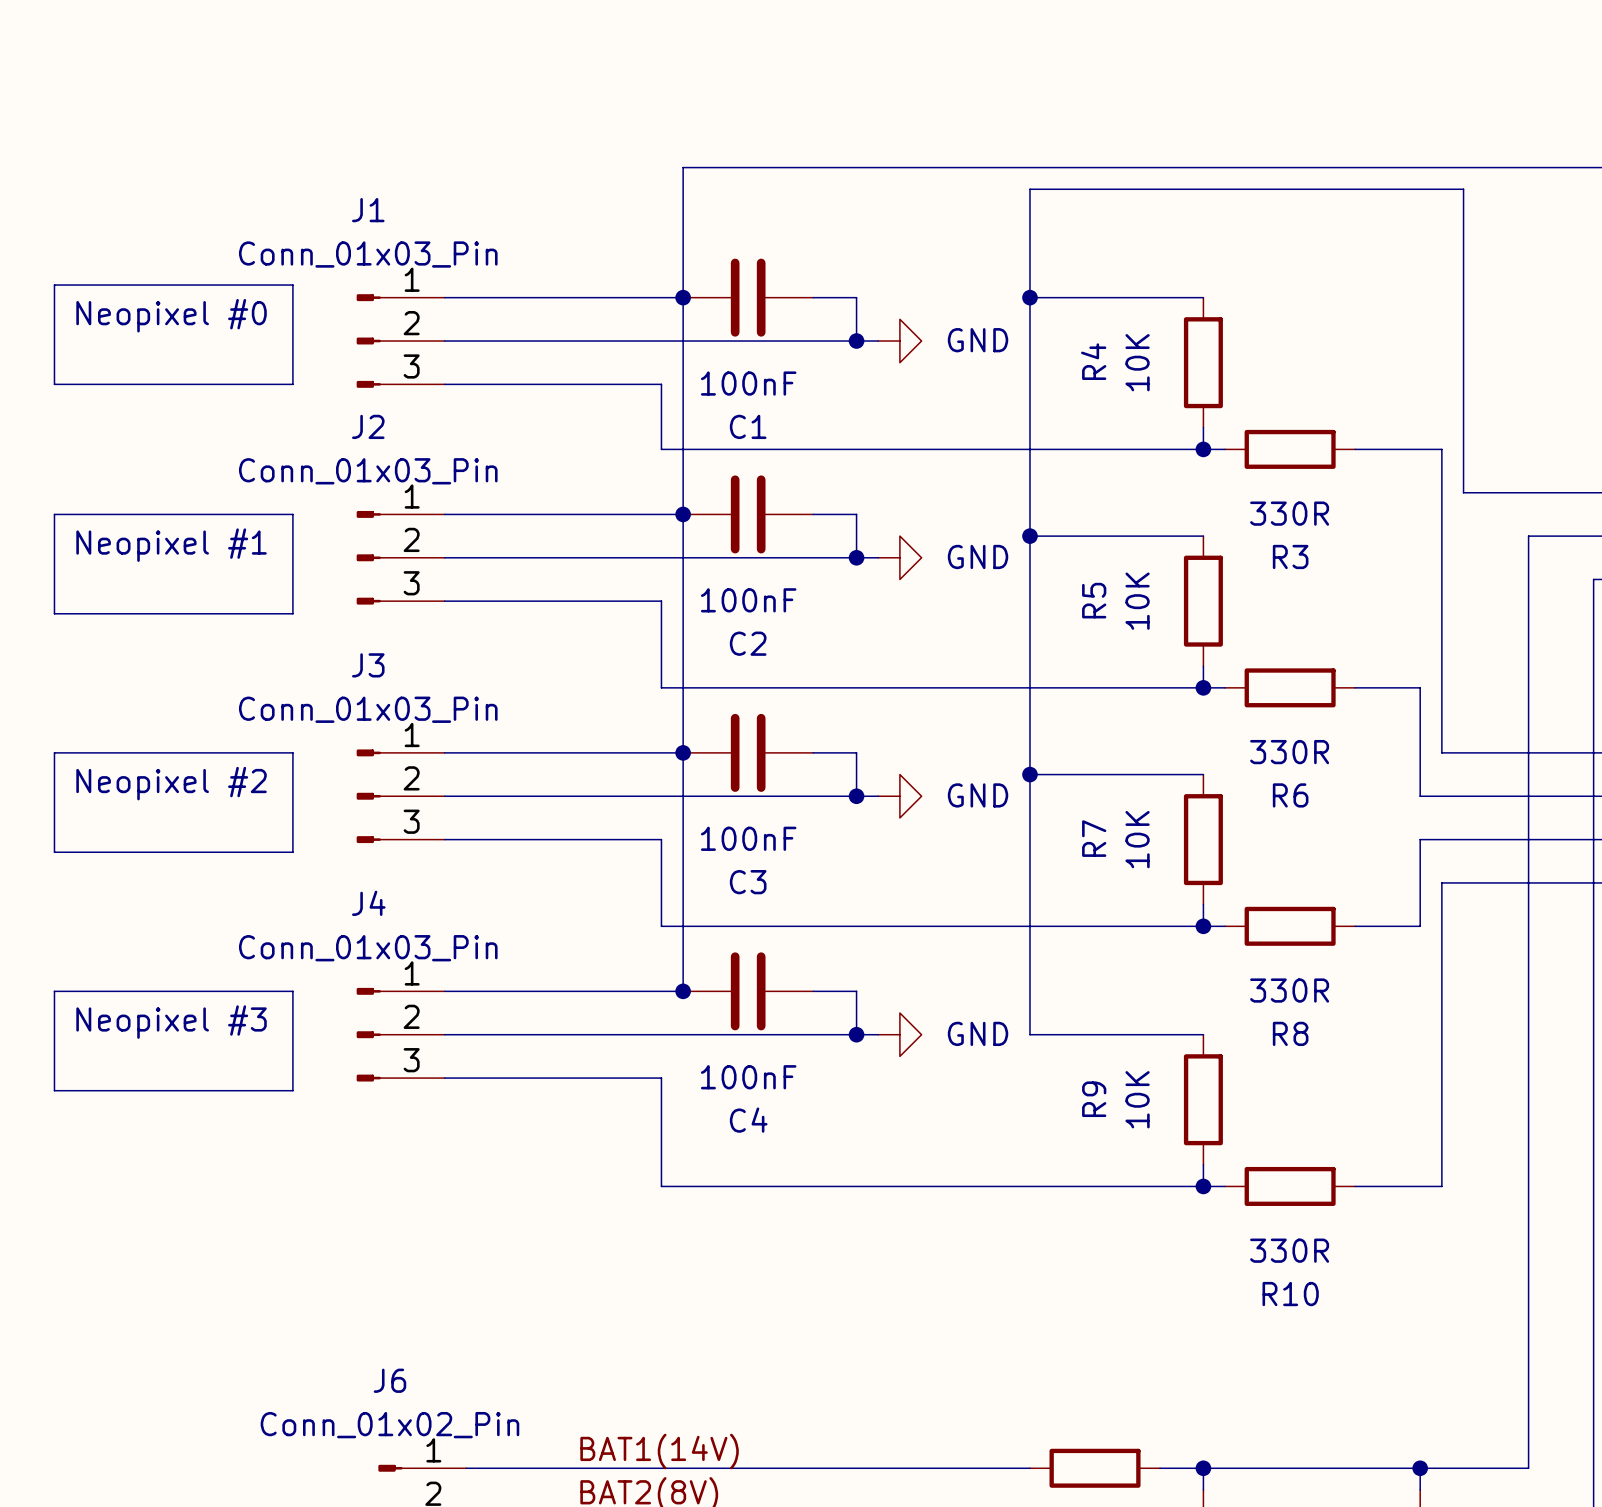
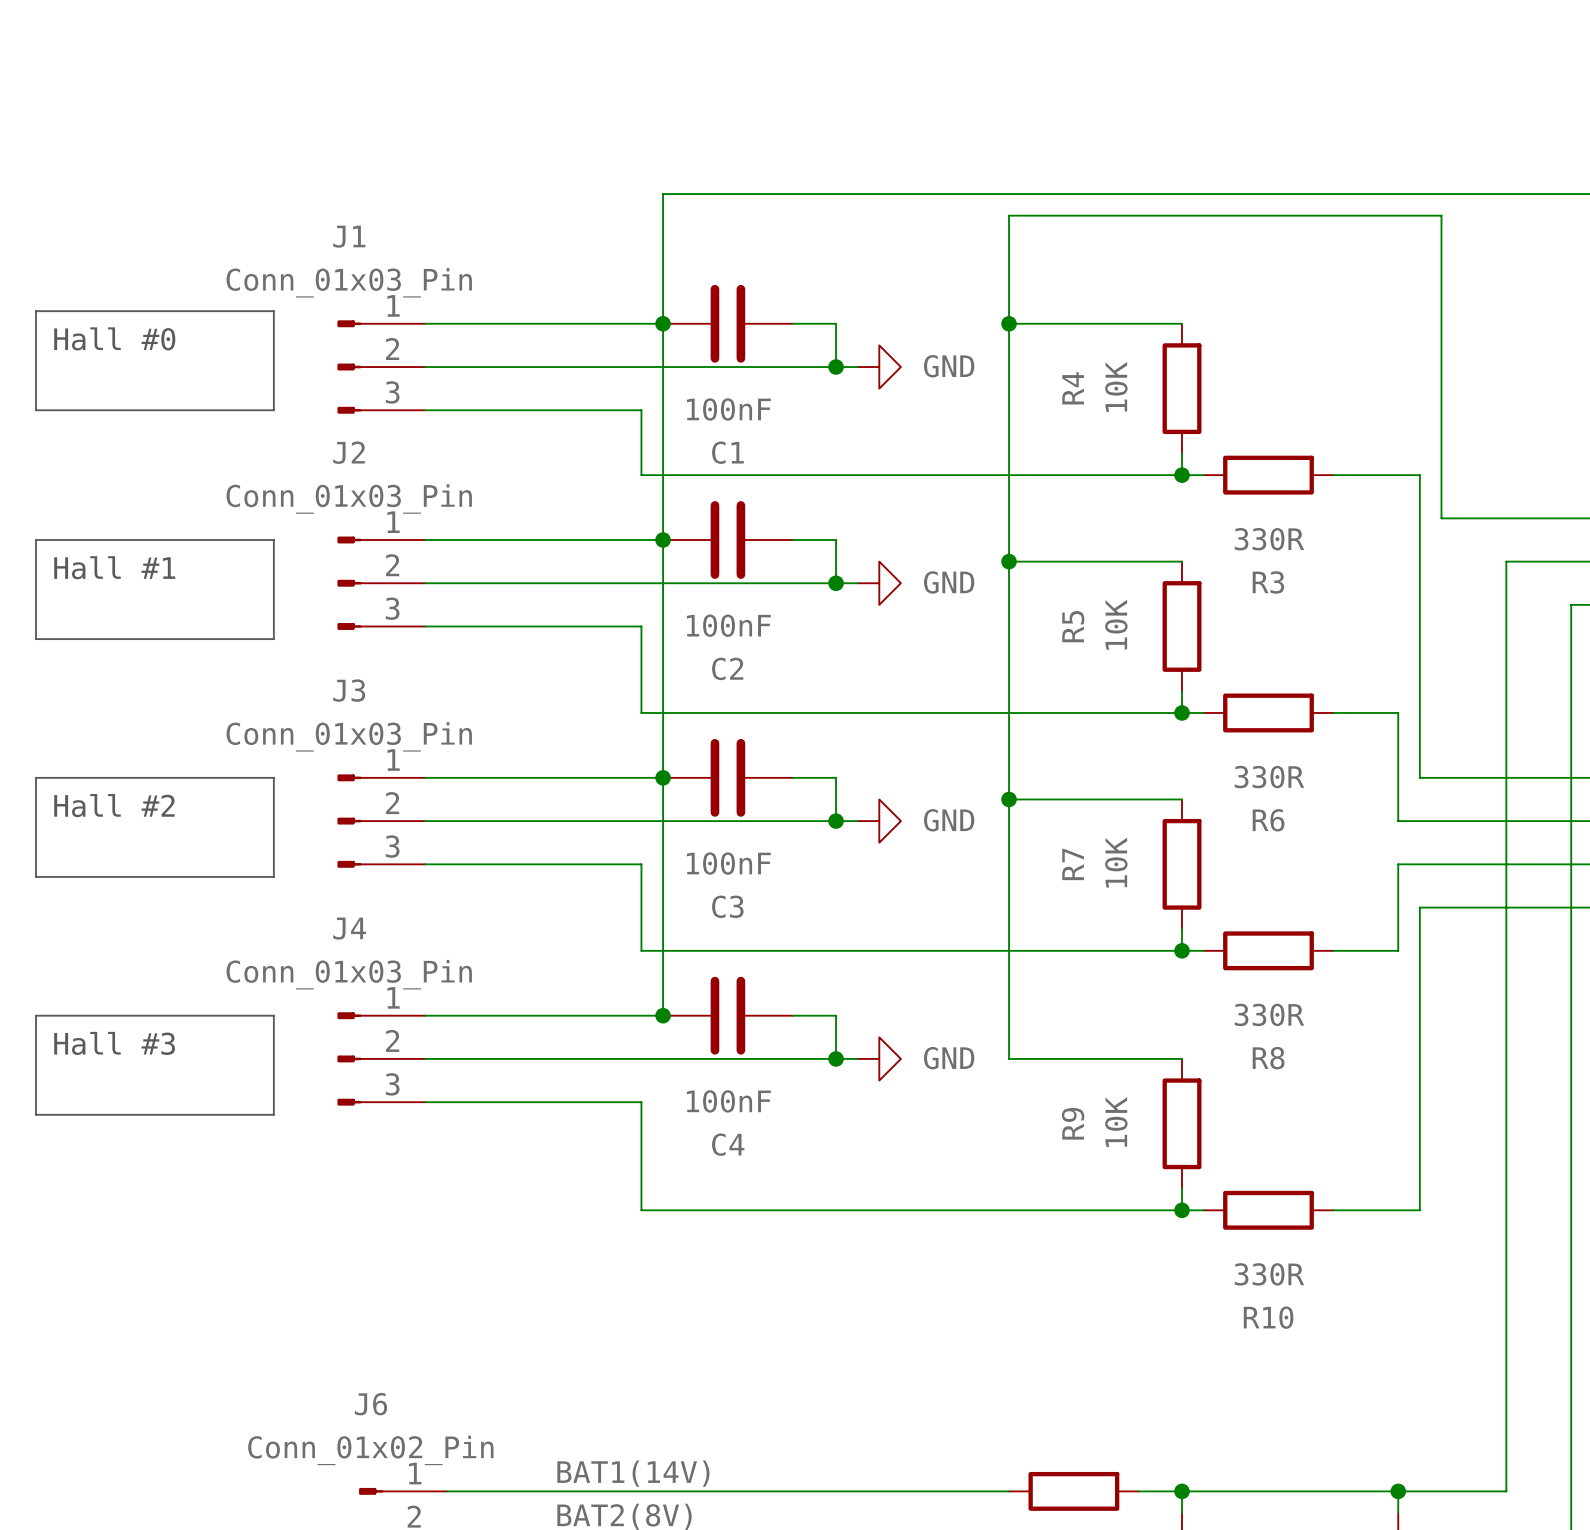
text: Neopixel #0 (171, 315) -> Hall #0 (114, 338)
text: Neopixel #1 (171, 545) -> Hall #1 (114, 567)
text: Neopixel #2 (171, 783) -> Hall #2 (114, 805)
text: Neopixel #3 (171, 1022) -> Hall #3 (114, 1043)

